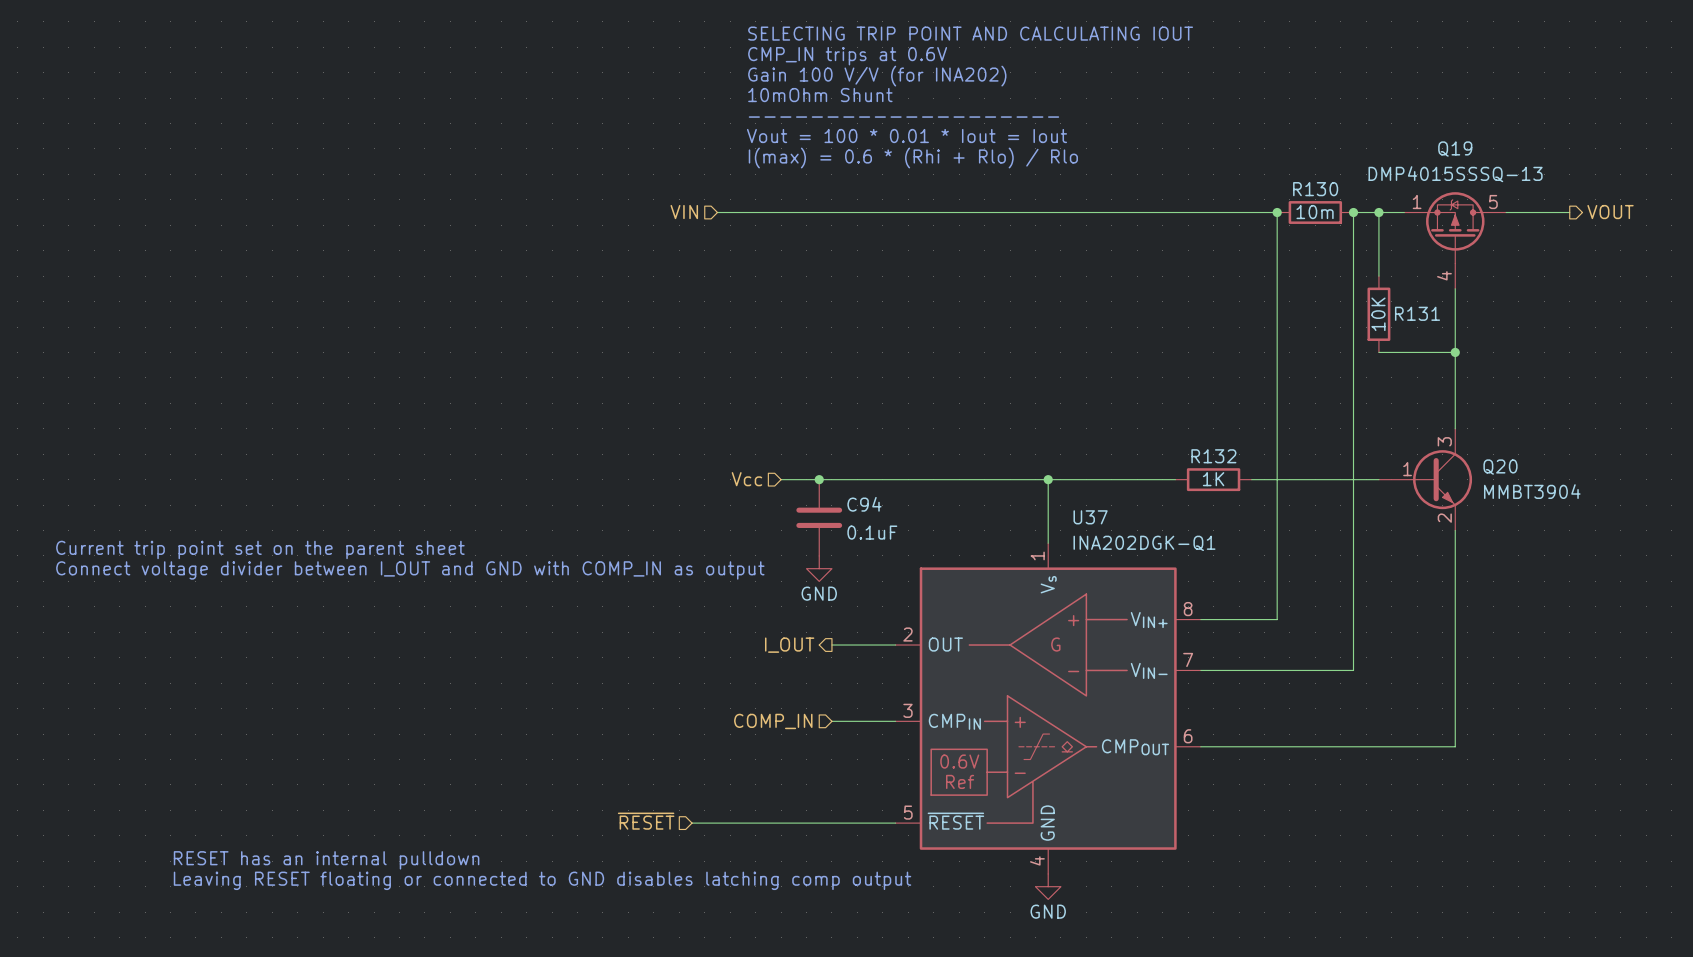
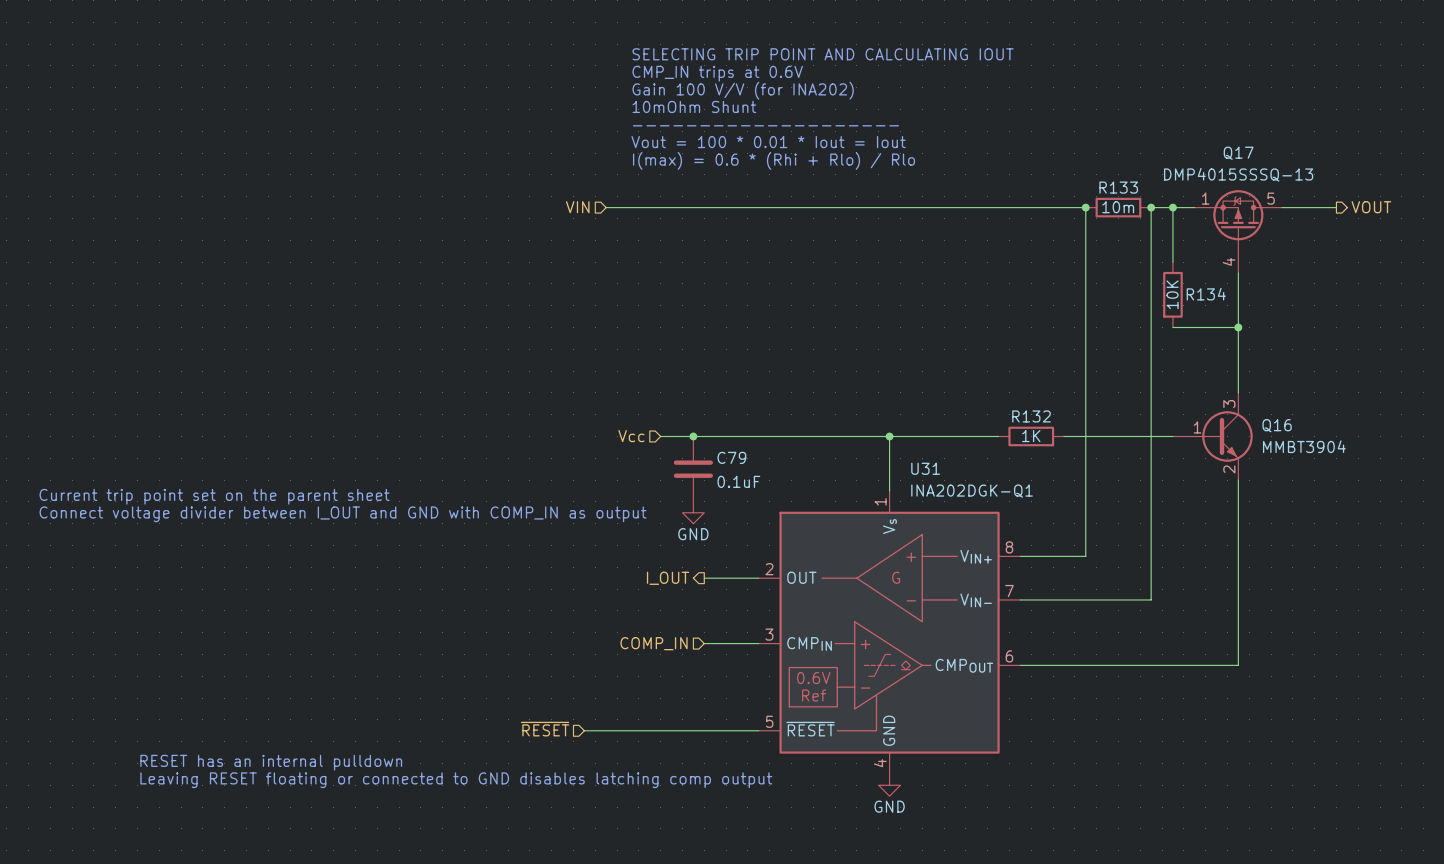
Q19 name: Q19 (1455, 149) -> Q17 (1238, 153)
R130 name: R130 (1315, 189) -> R133 (1118, 187)
R131 name: R131 (1417, 313) -> R134 (1206, 294)
Q20 name: Q20 (1500, 467) -> Q16 (1277, 425)
C94 name: C94 (864, 504) -> C79 (731, 457)
U37 name: U37 (1090, 517) -> U31 (925, 468)

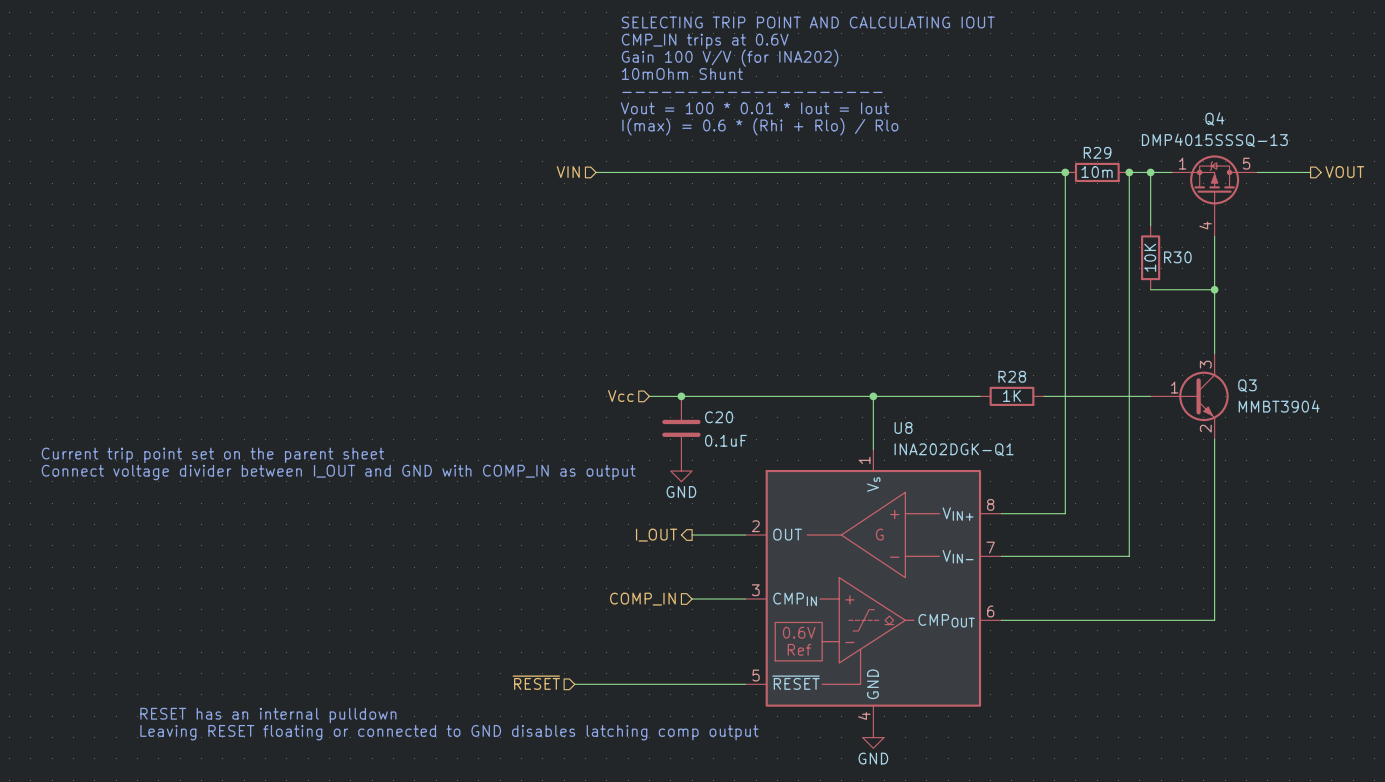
Q17 name: Q17 (1238, 153) -> Q4 (1214, 118)
R133 name: R133 (1118, 187) -> R29 (1097, 152)
R134 name: R134 (1206, 294) -> R30 (1177, 257)
R132 name: R132 (1031, 416) -> R28 (1012, 376)
Q16 name: Q16 (1277, 425) -> Q3 (1247, 385)
C79 name: C79 (731, 457) -> C20 (719, 417)
U31 name: U31 (925, 468) -> U8 (903, 427)

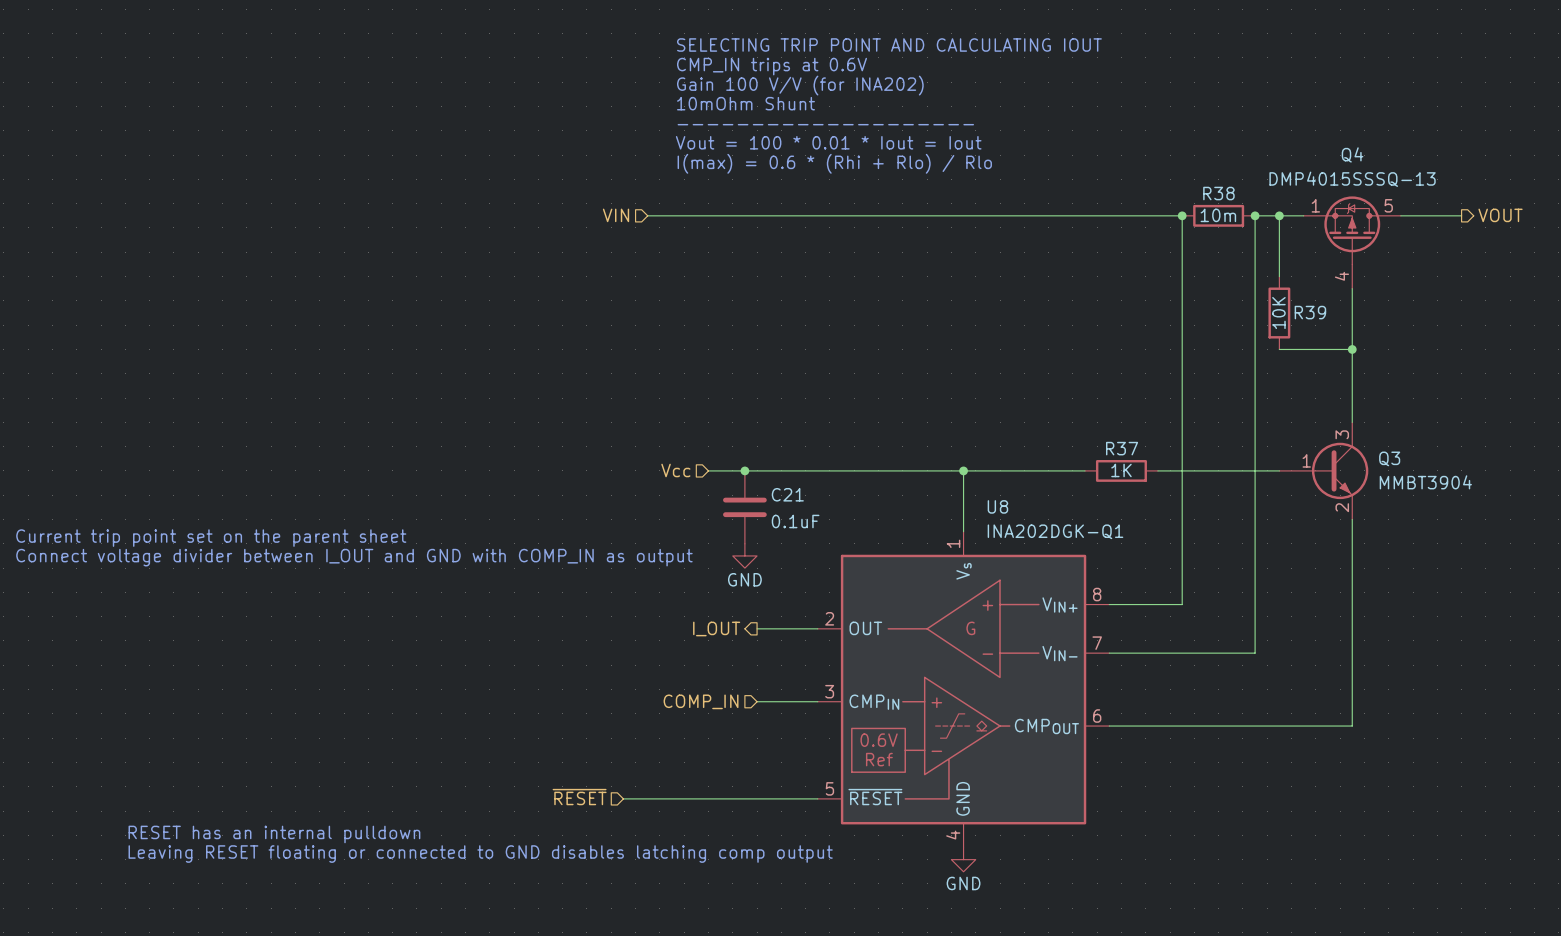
R29 name: R29 (1097, 152) -> R38 (1218, 193)
R30 name: R30 (1177, 257) -> R39 (1310, 312)
R28 name: R28 (1012, 376) -> R37 (1122, 448)
C20 name: C20 (719, 417) -> C21 (787, 494)

